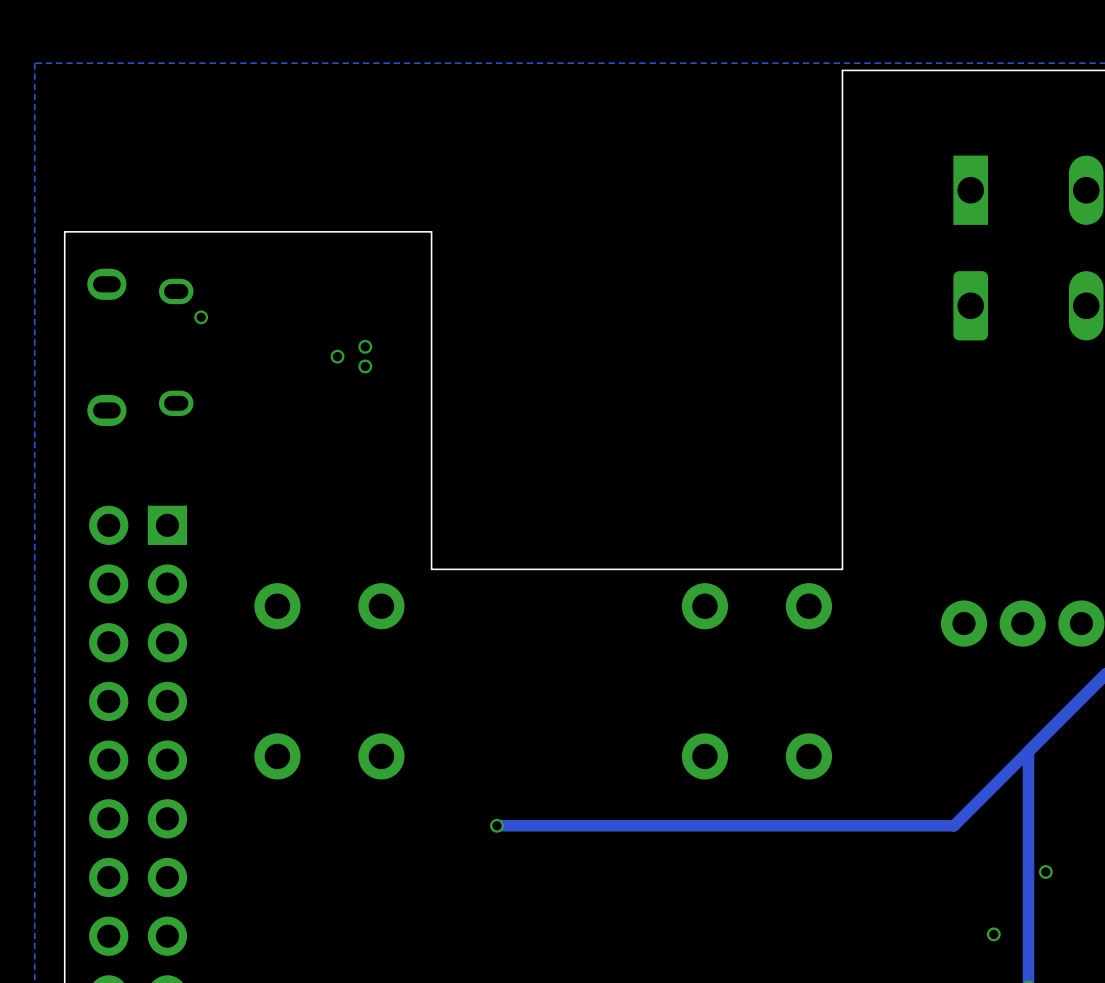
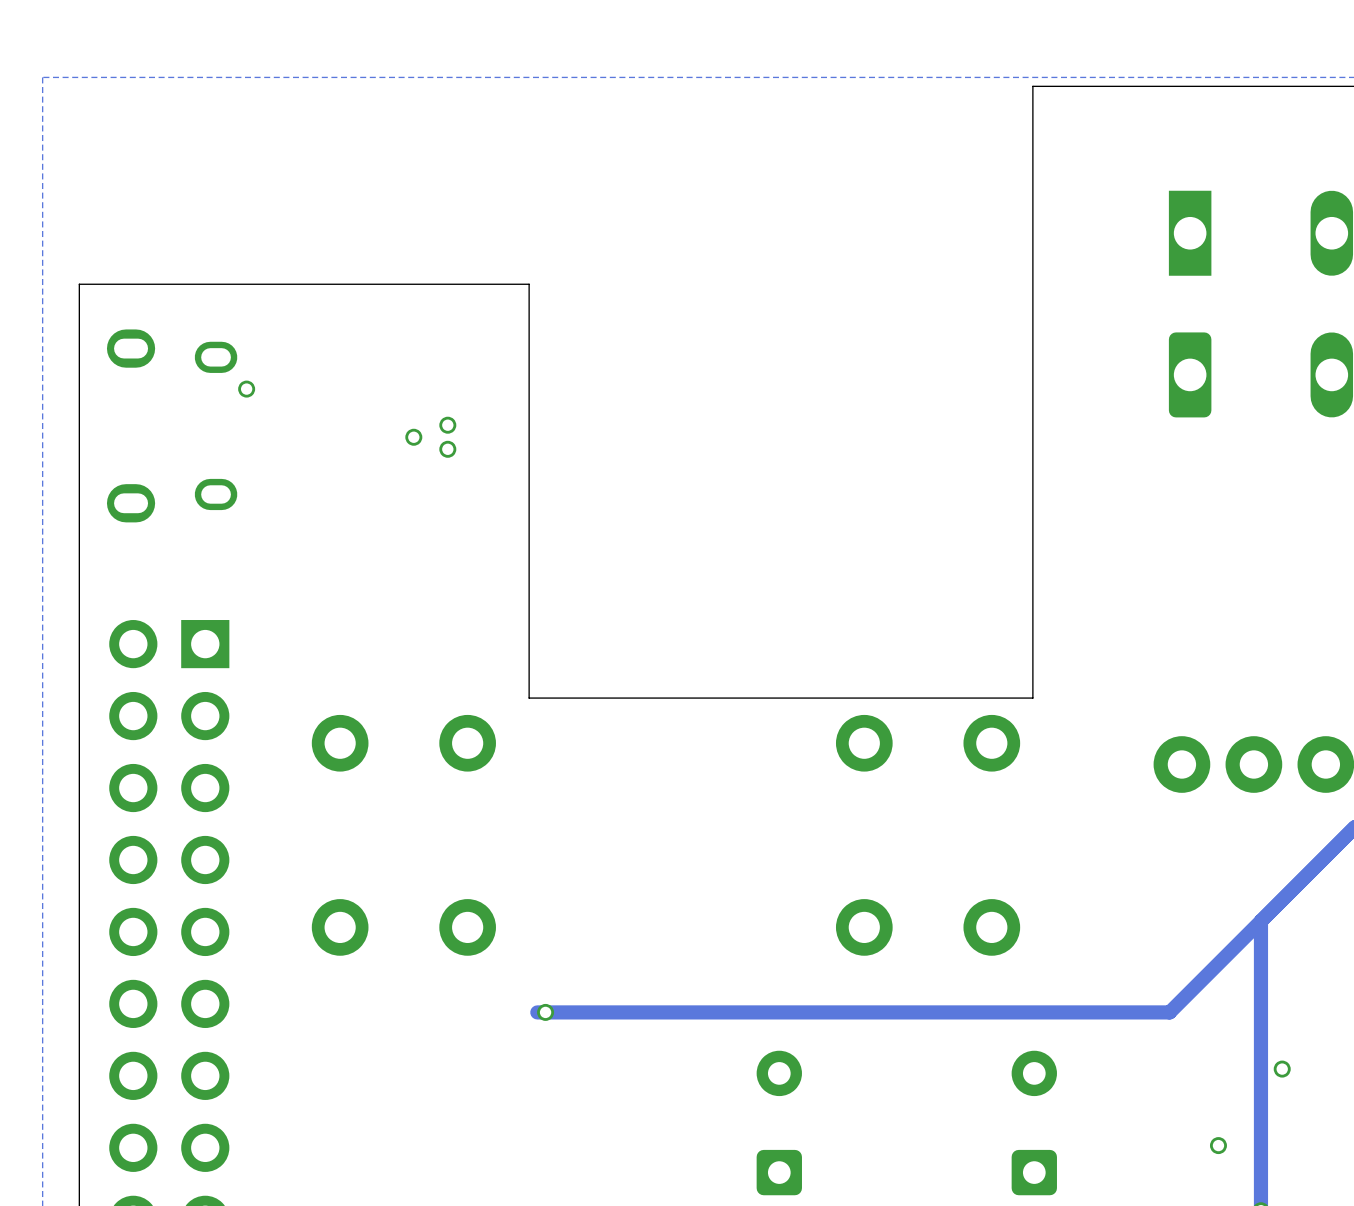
track: none -> (609, 1012) (537, 1012)
via position: (496, 825) -> (545, 1012)
part: none -> (779, 1122)
part: none -> (1034, 1122)

